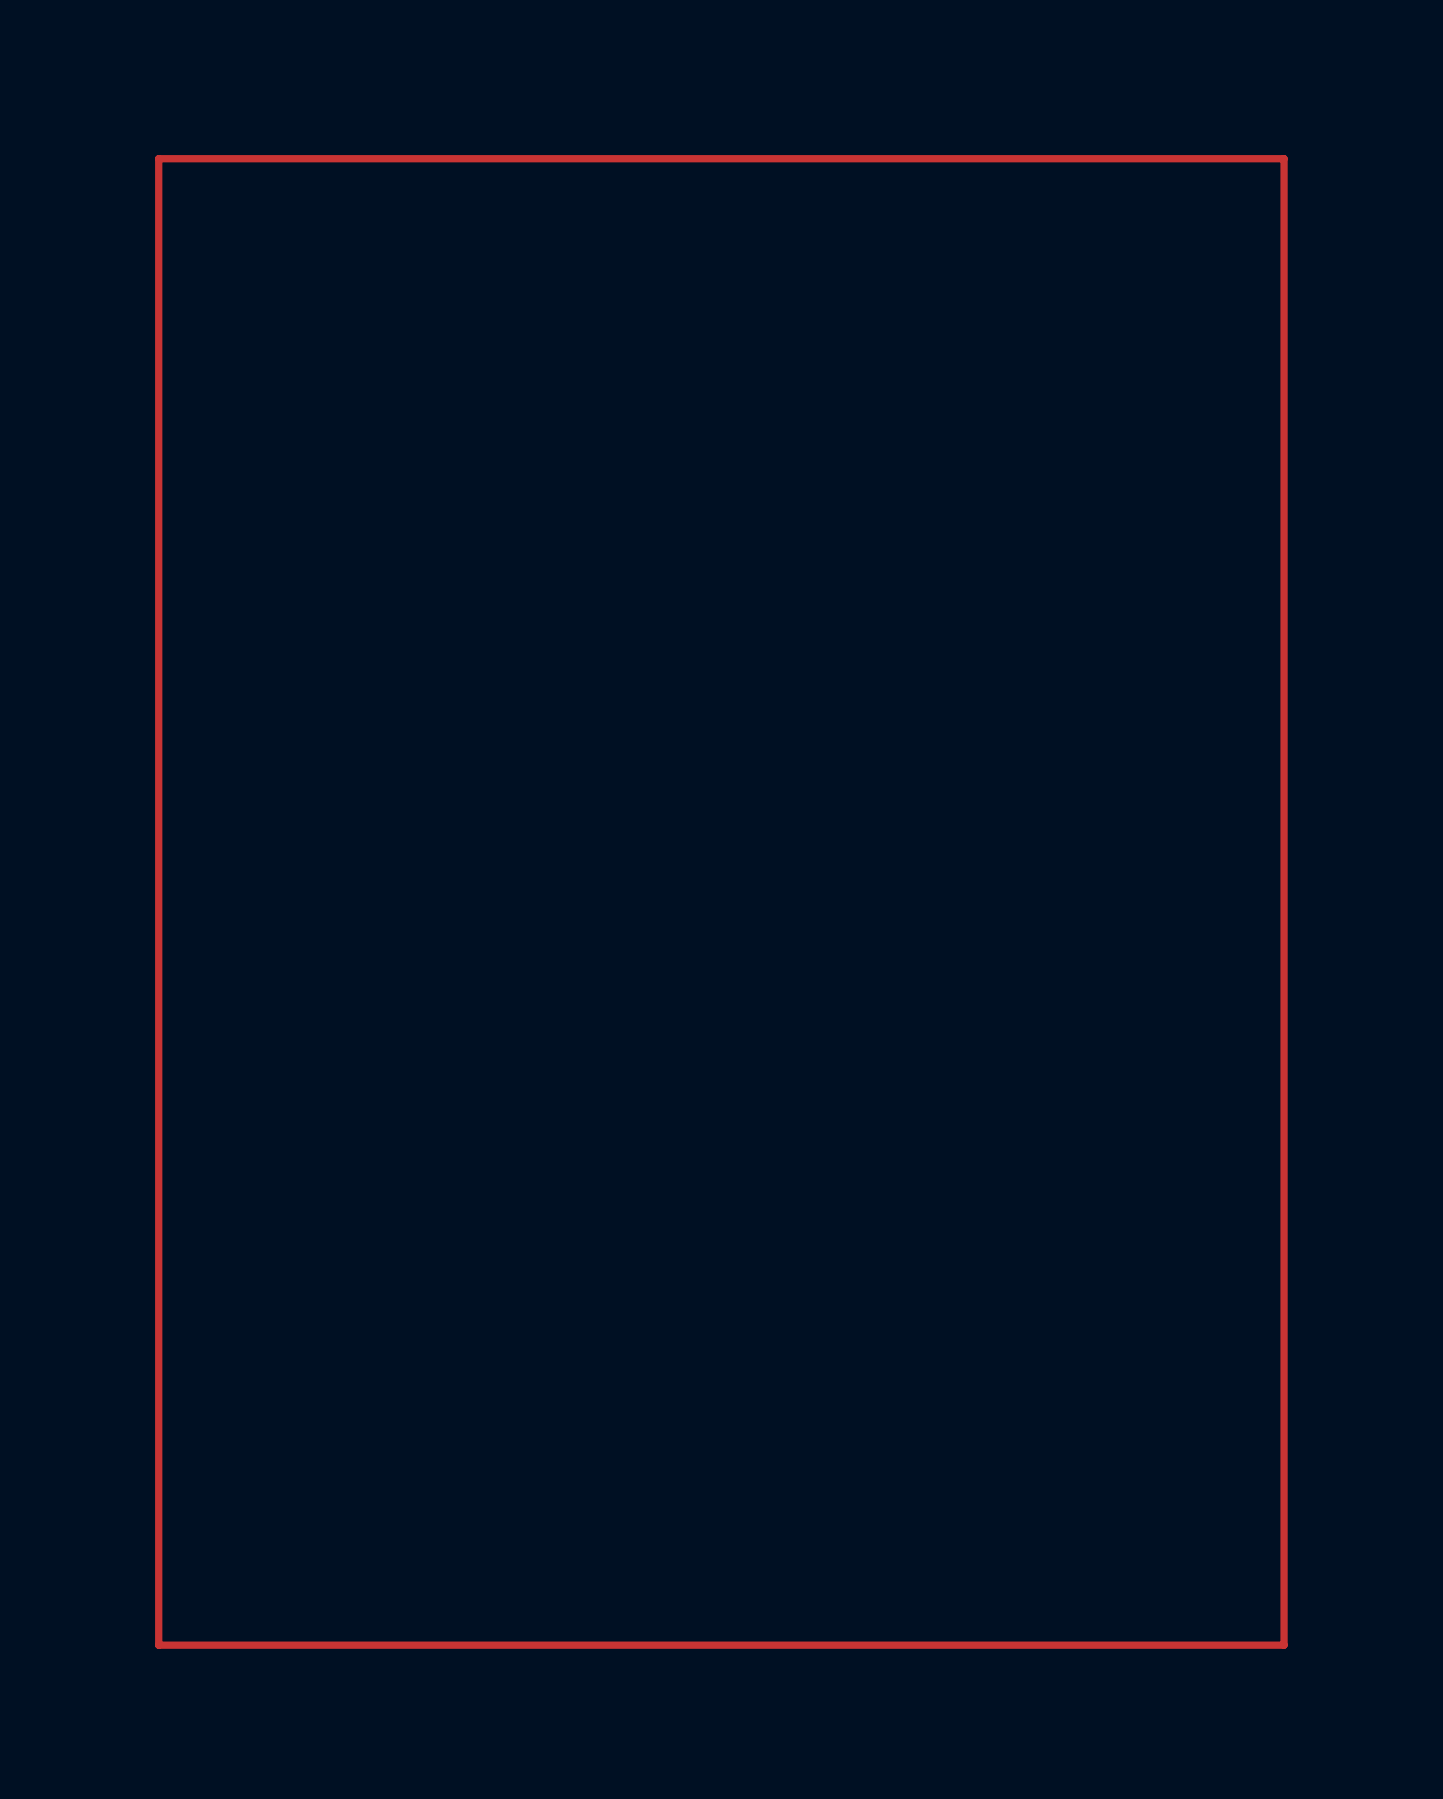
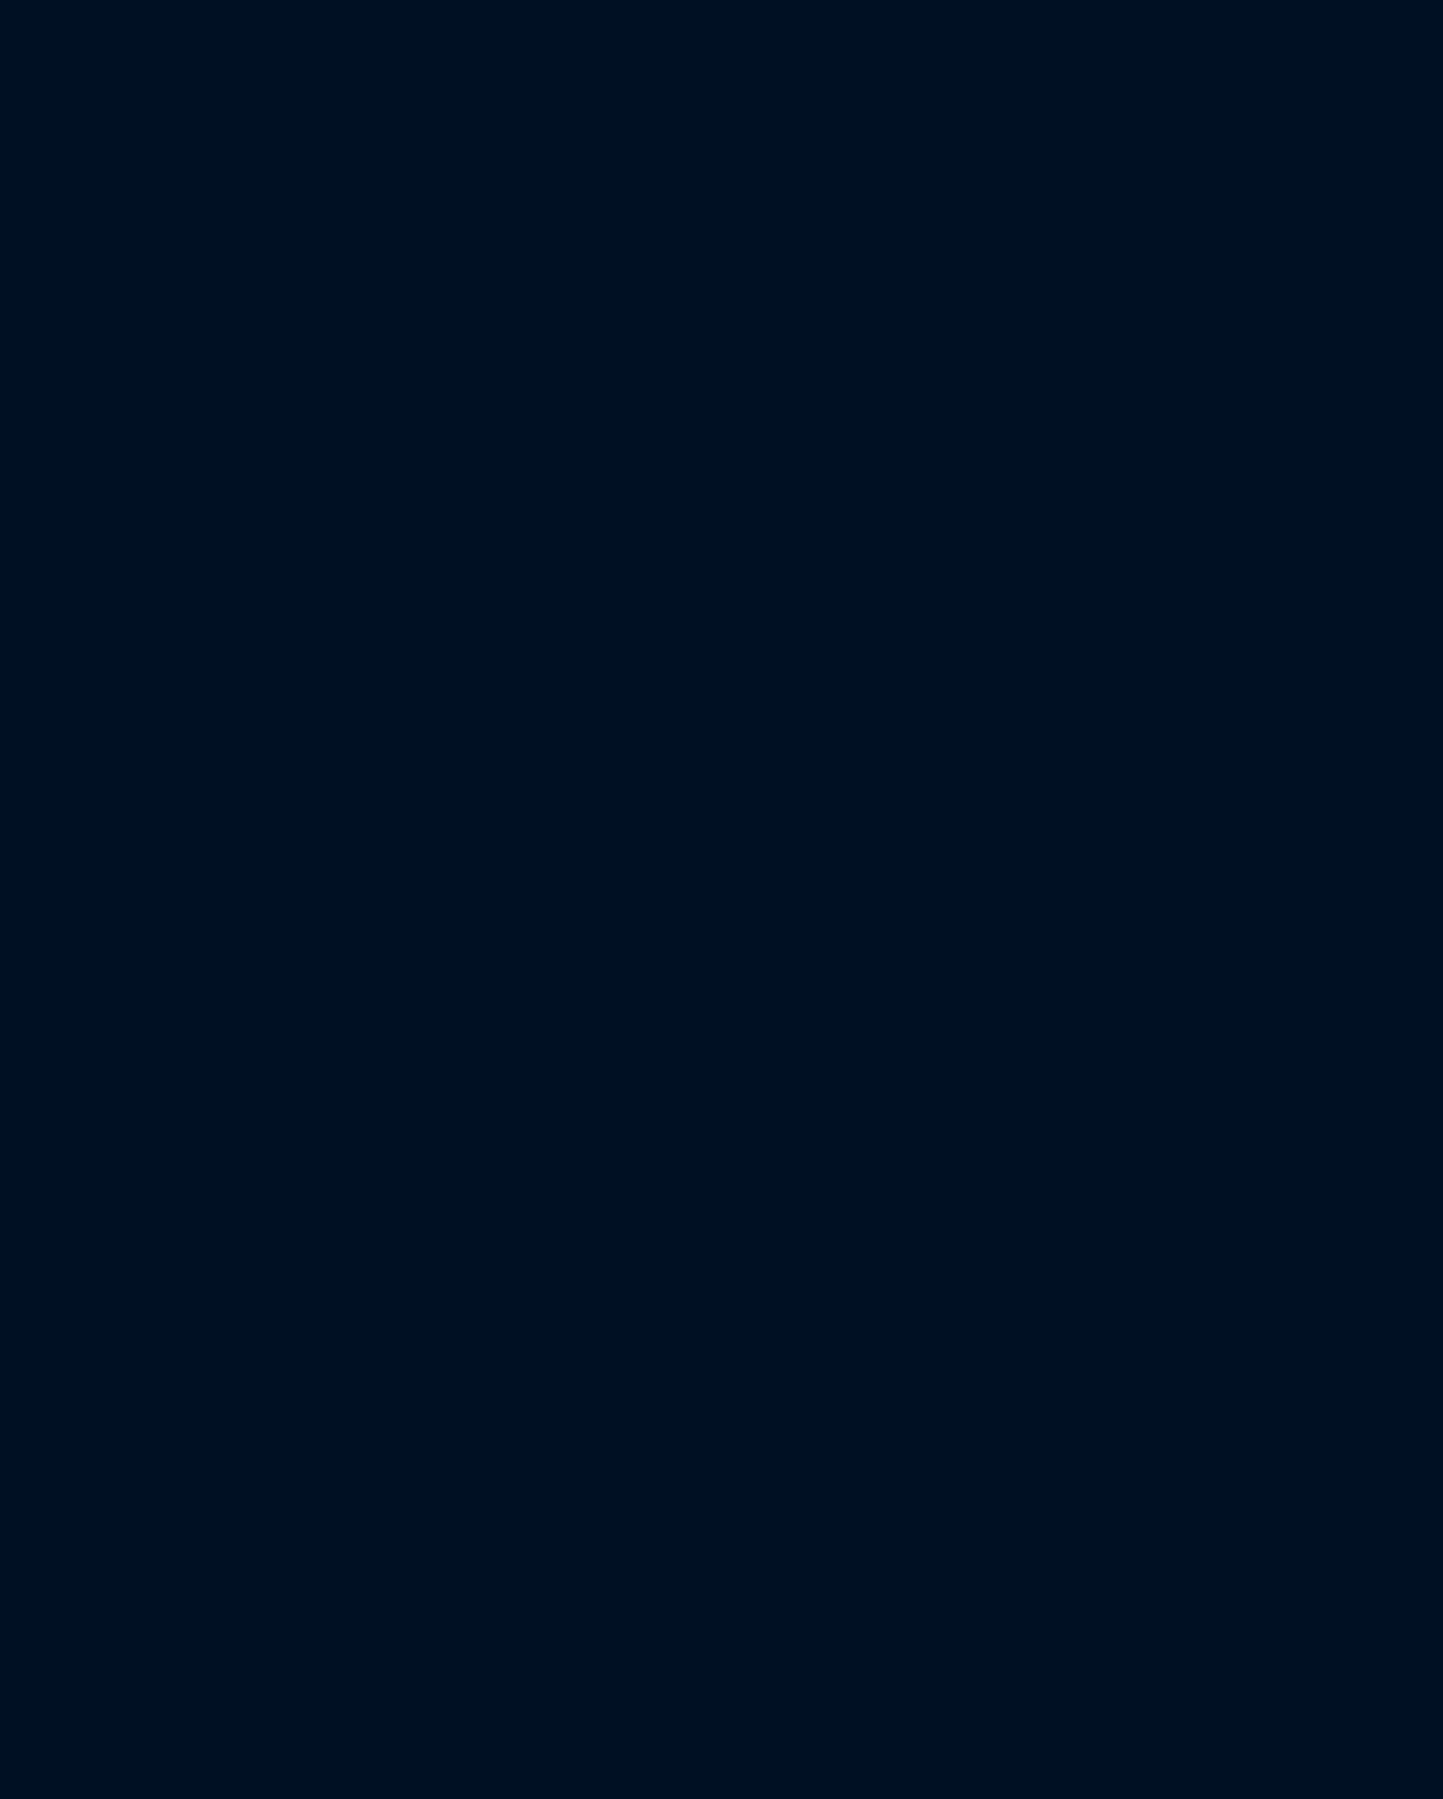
top track: (158, 158) (1284, 158) (1284, 1645) (158, 1645) (158, 158) -> none

